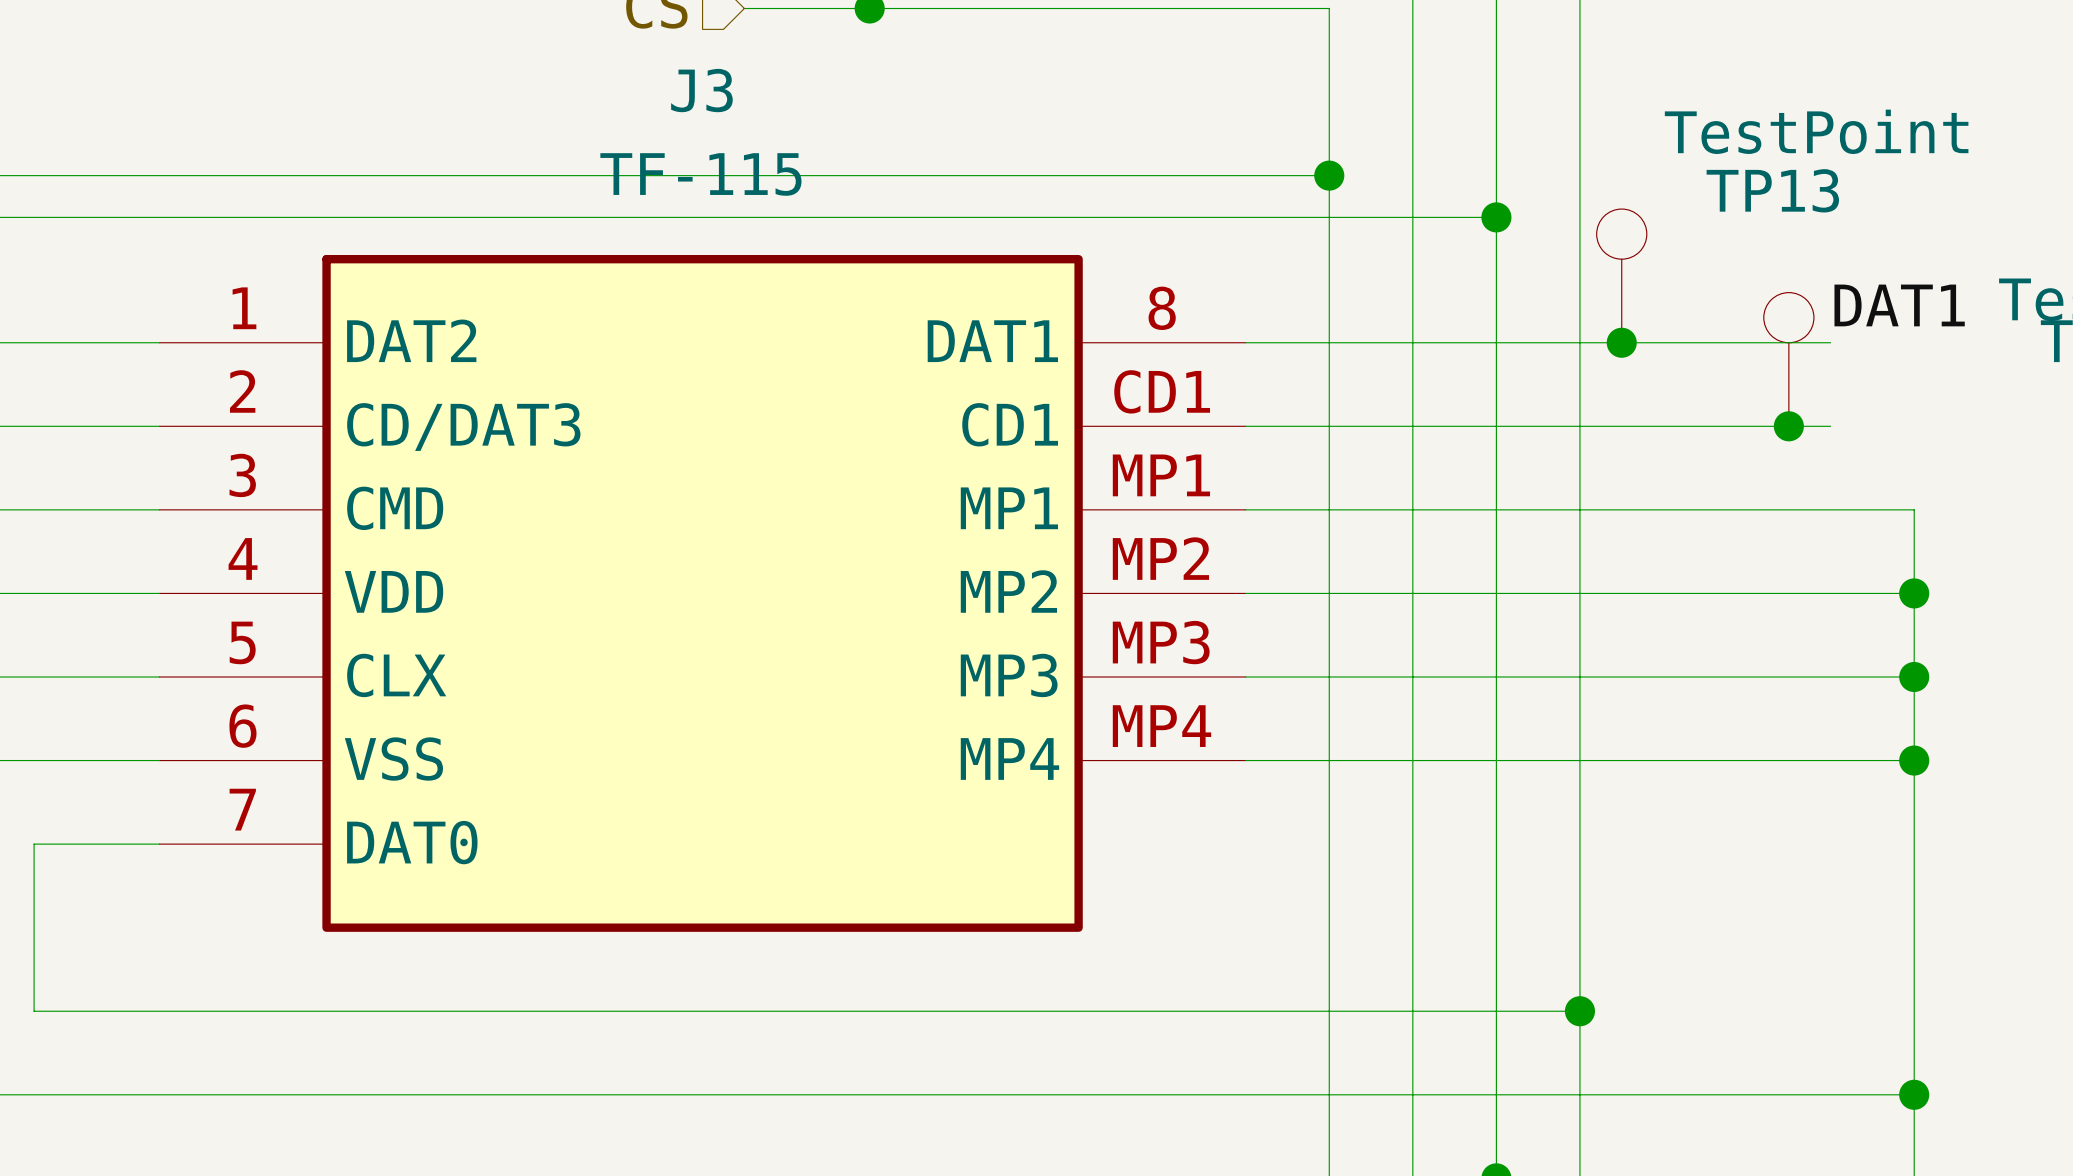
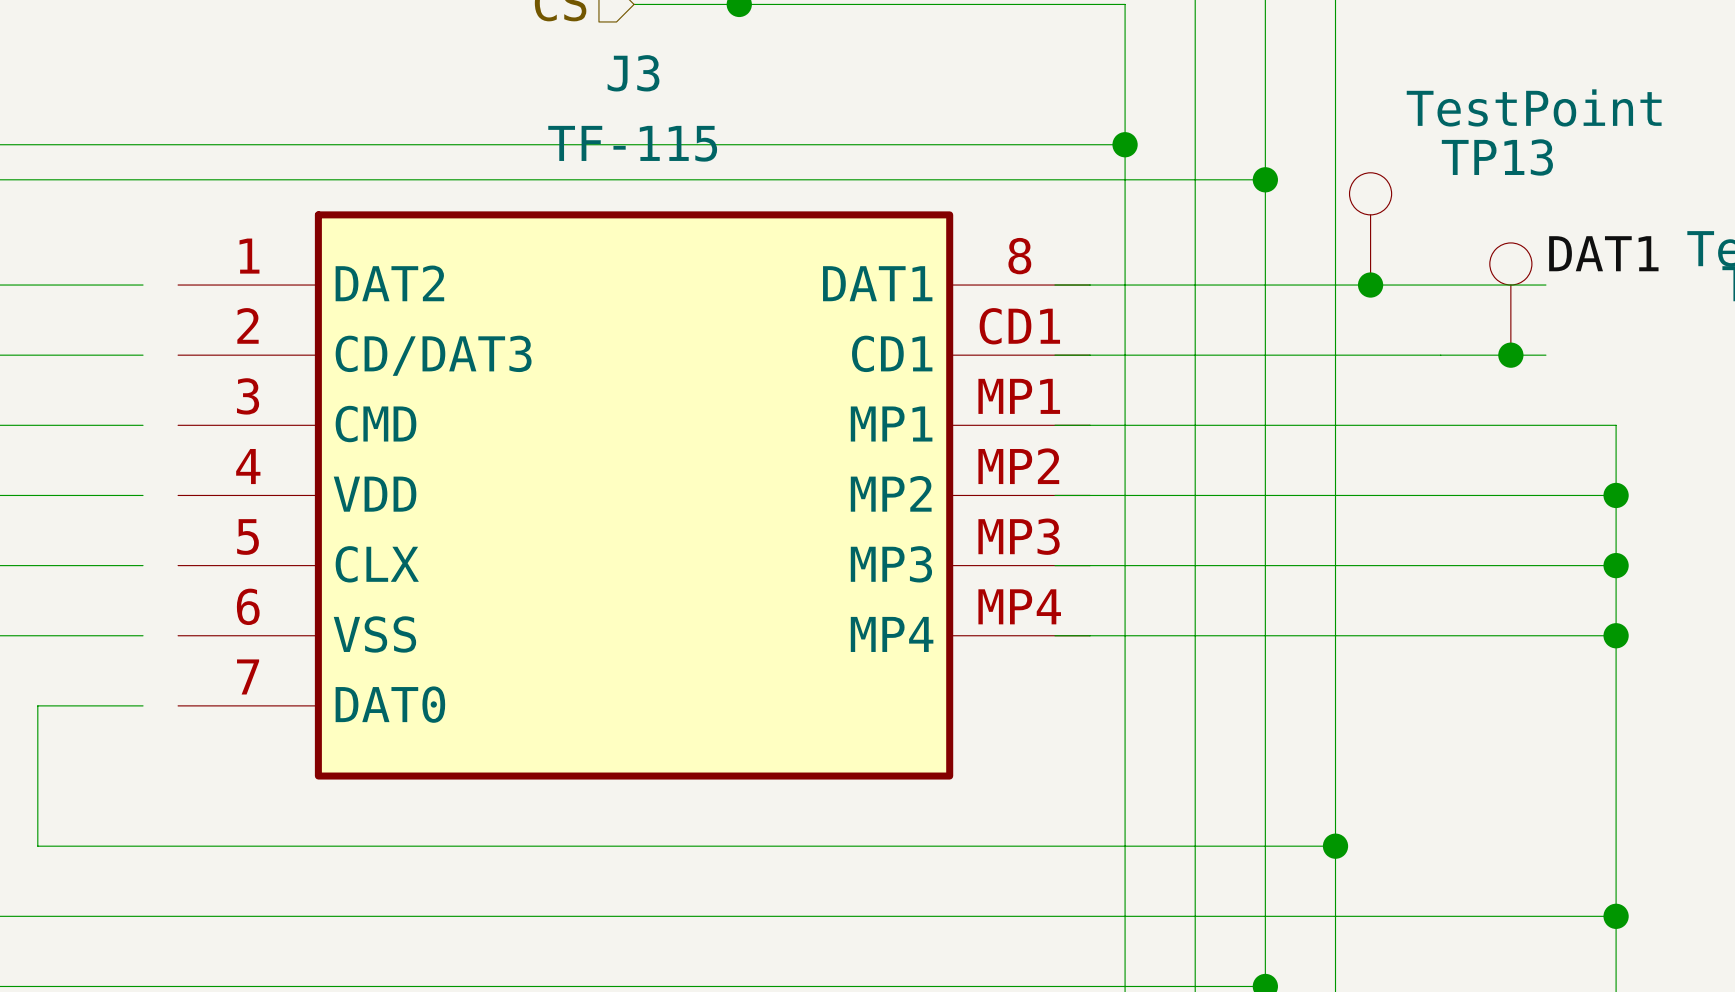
J3 position: (702, 593) -> (634, 495)

